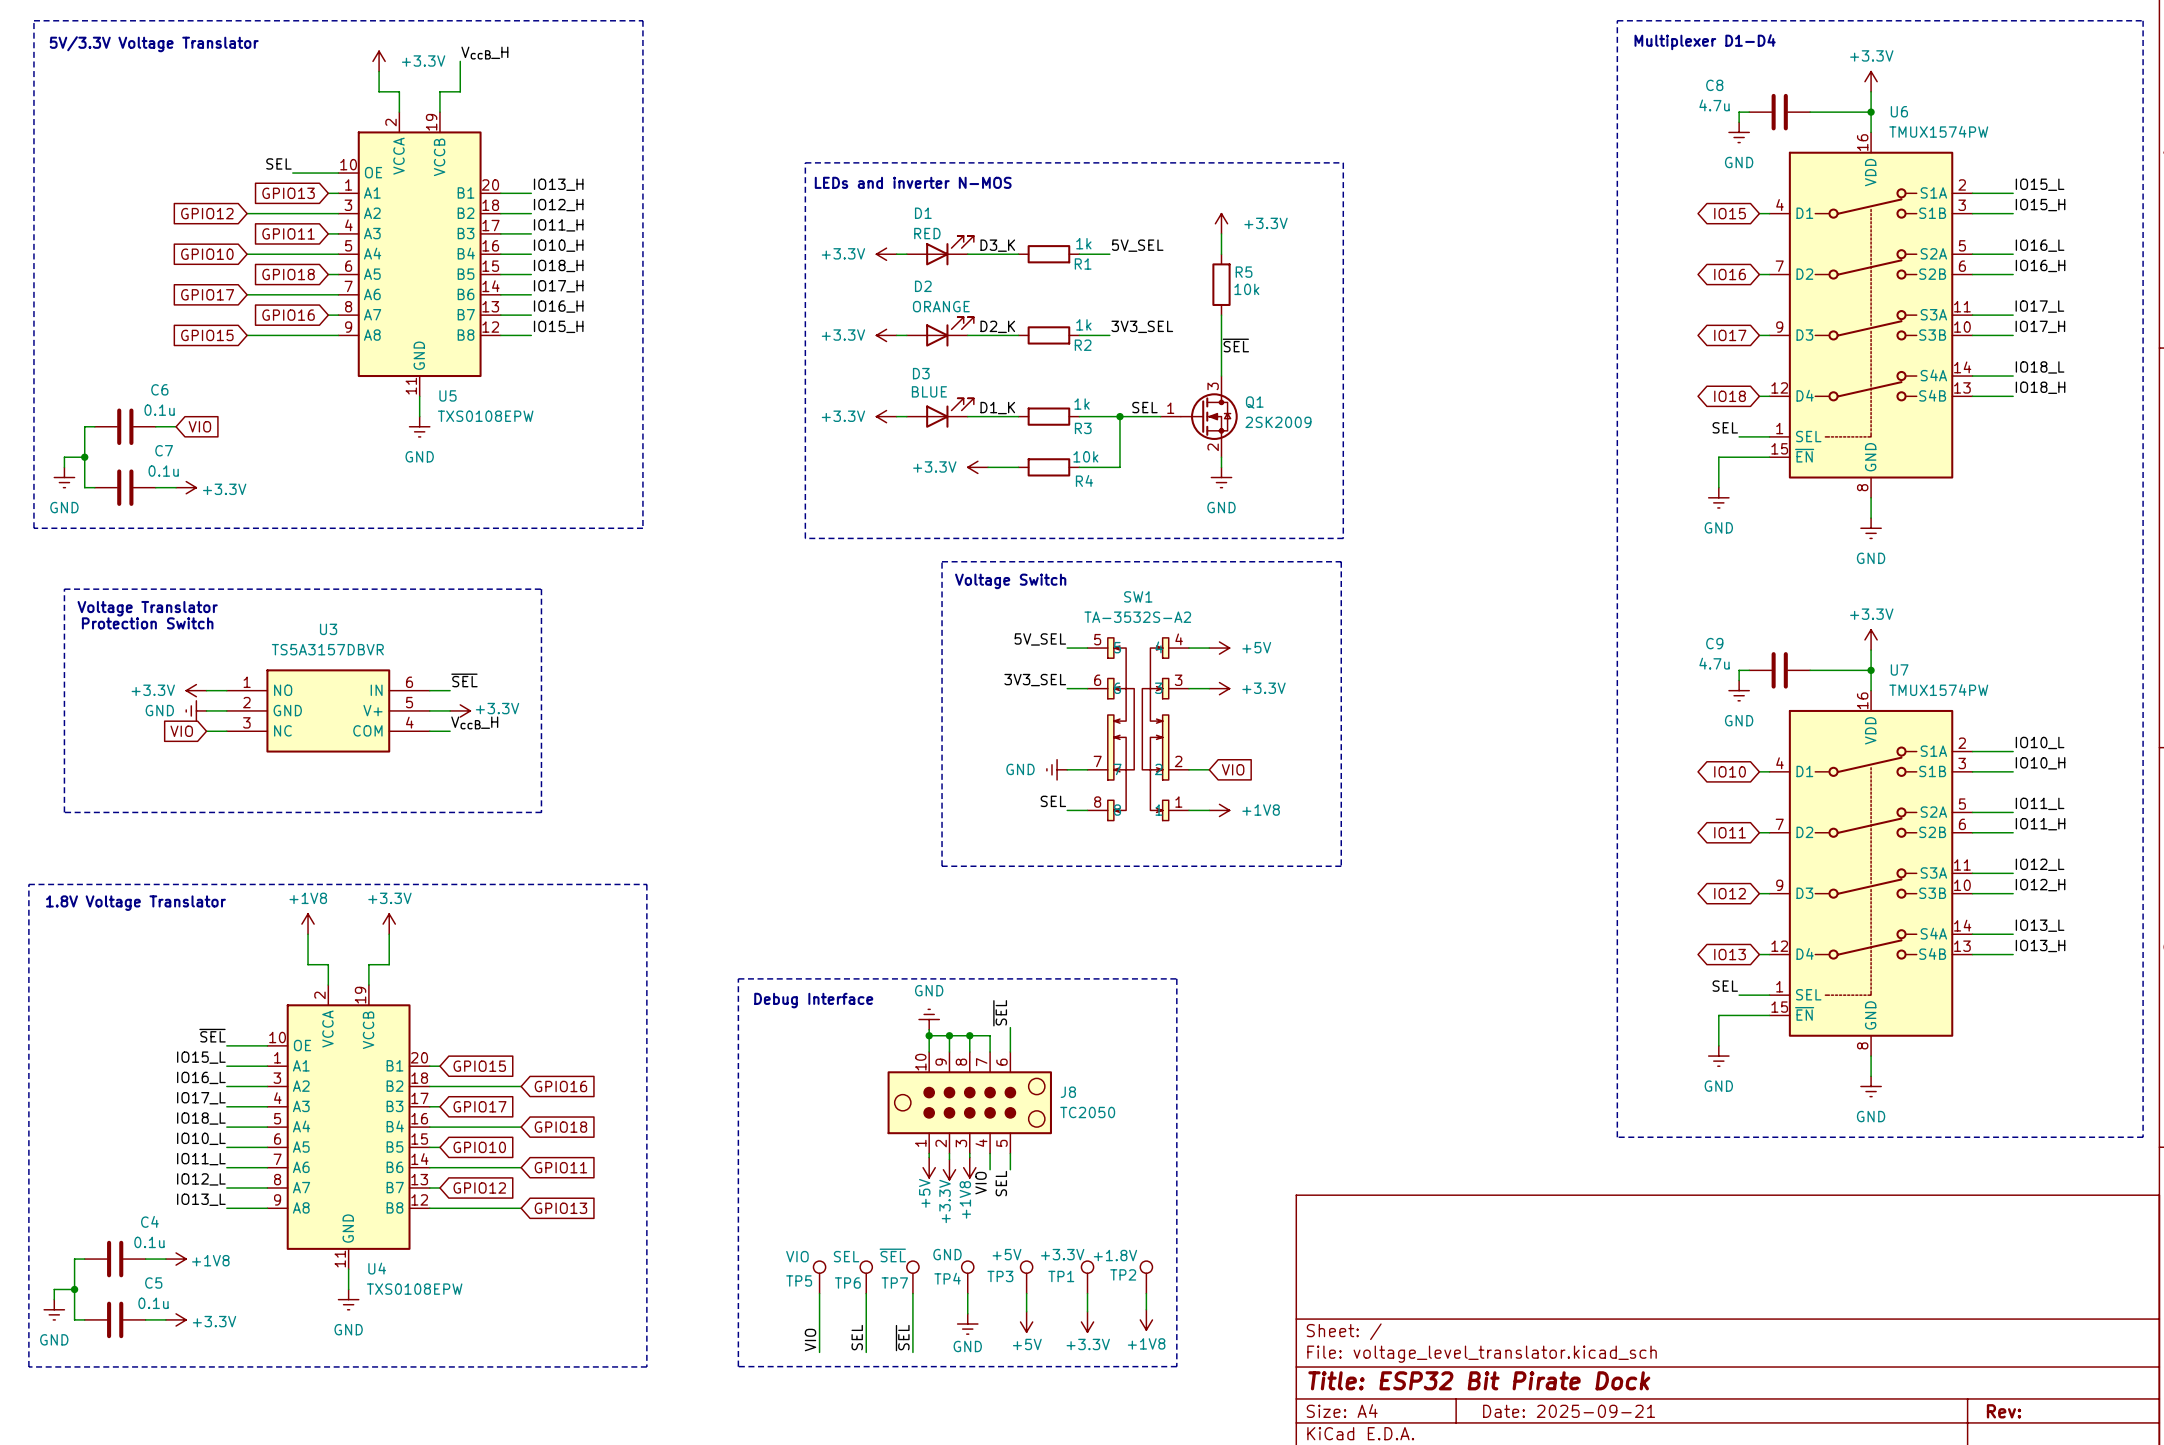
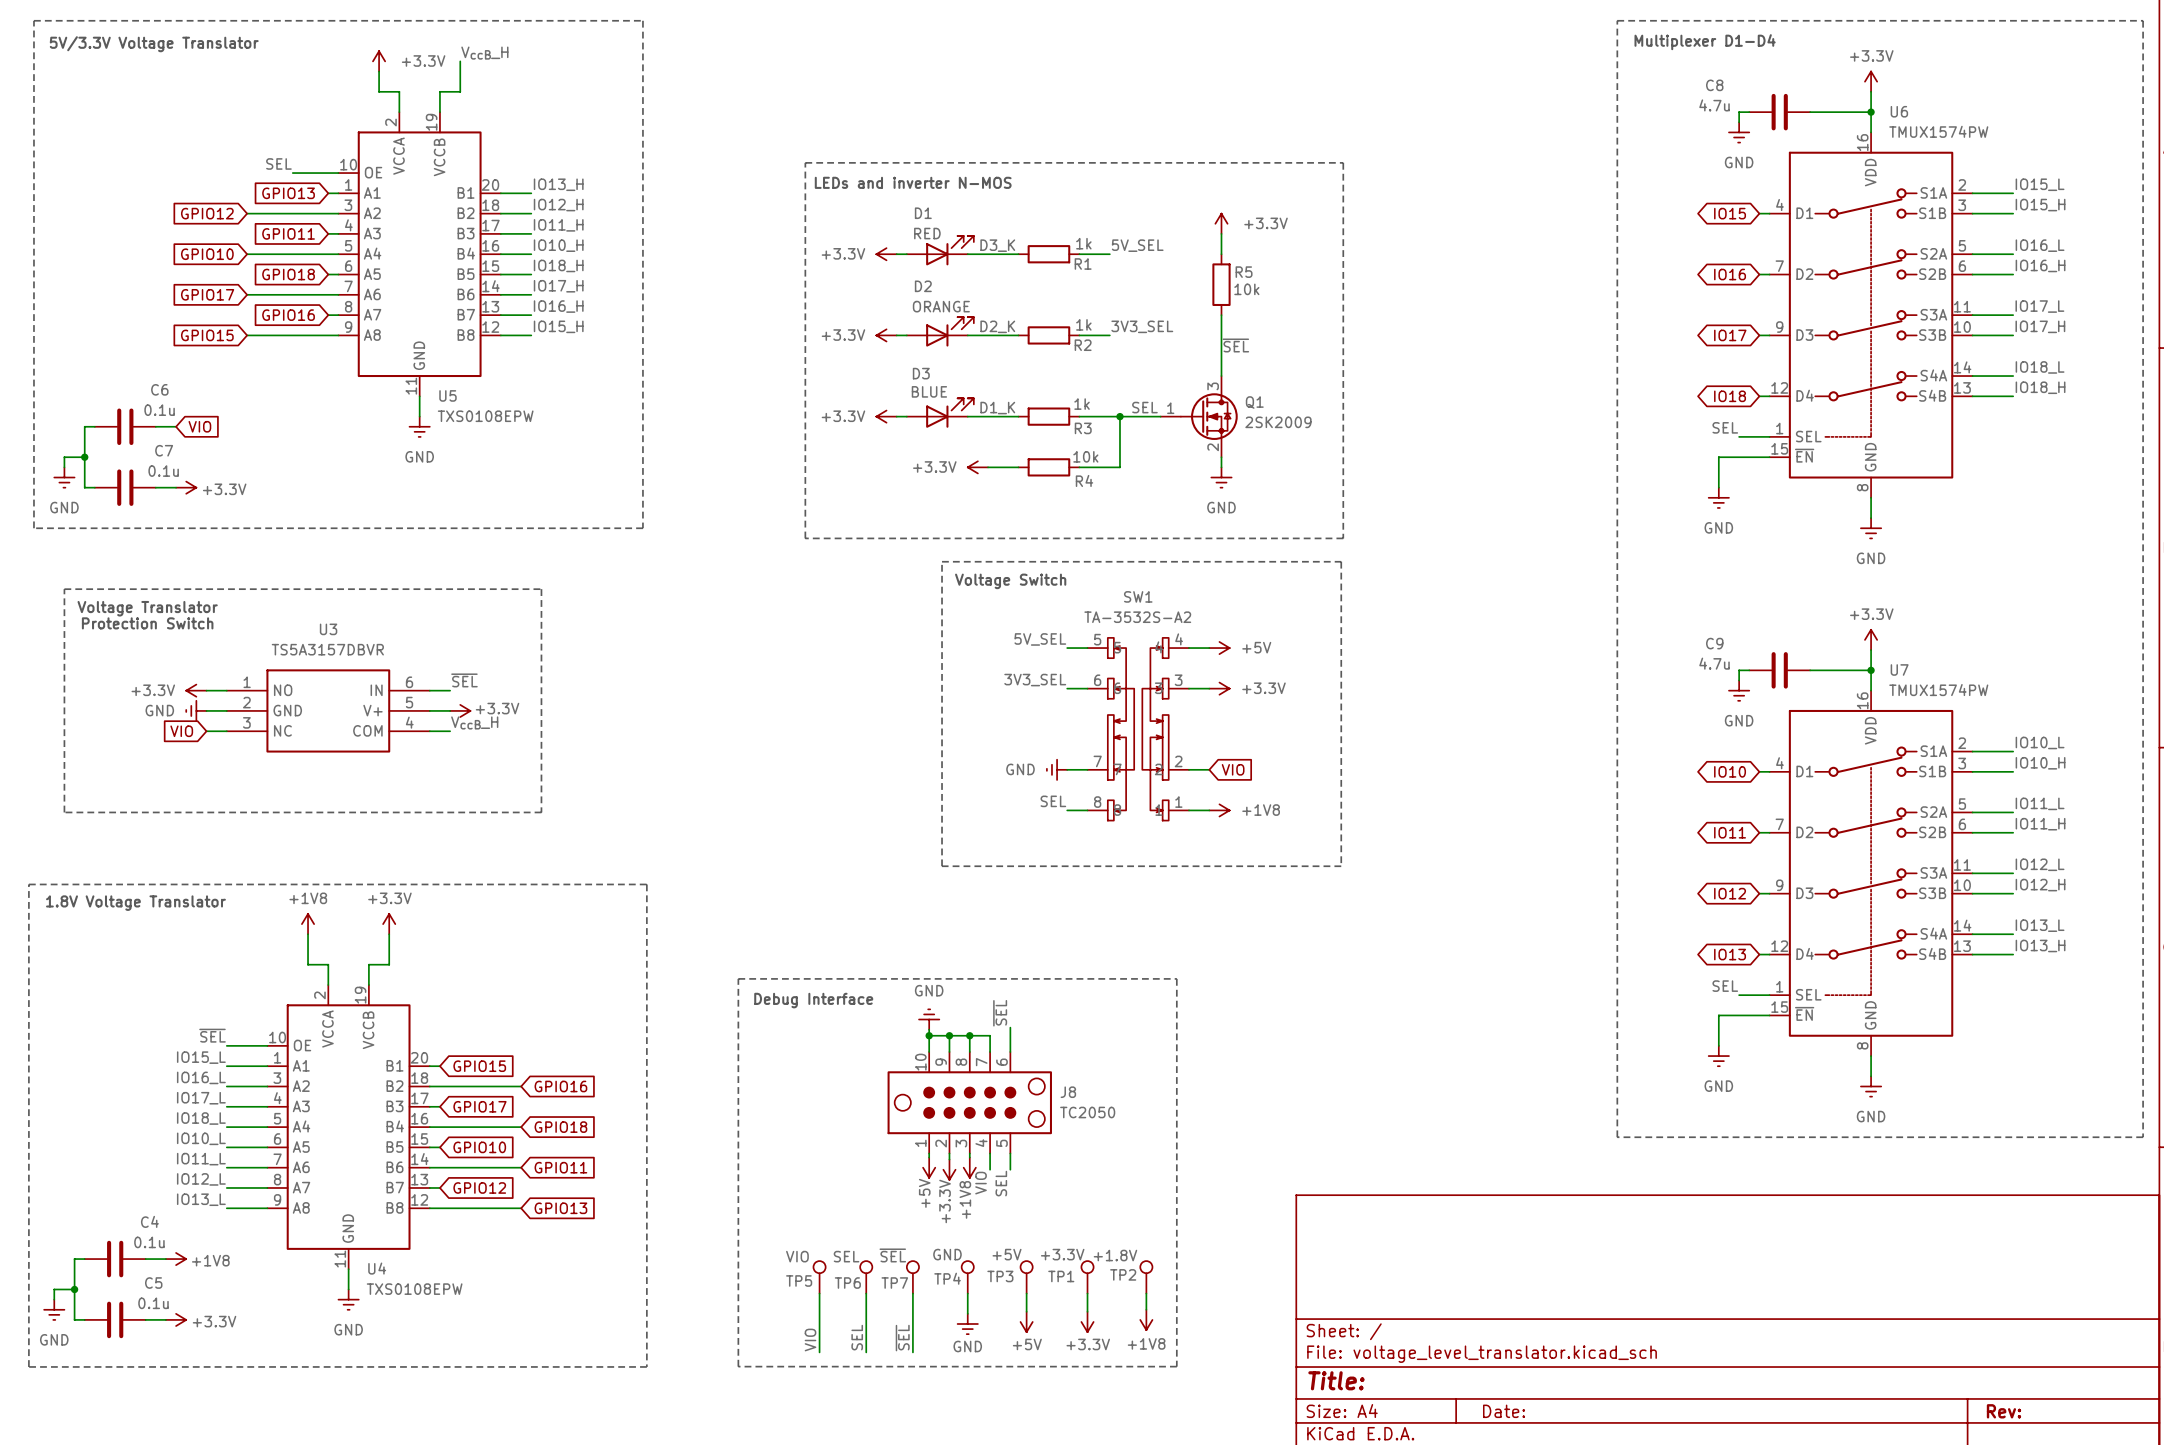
title block: Title: ESP32 Bit Pirate Dock (1479, 1380) -> Title: (1336, 1380)
title block: Date: 2025-09-21 (1569, 1411) -> Date: (1504, 1411)

